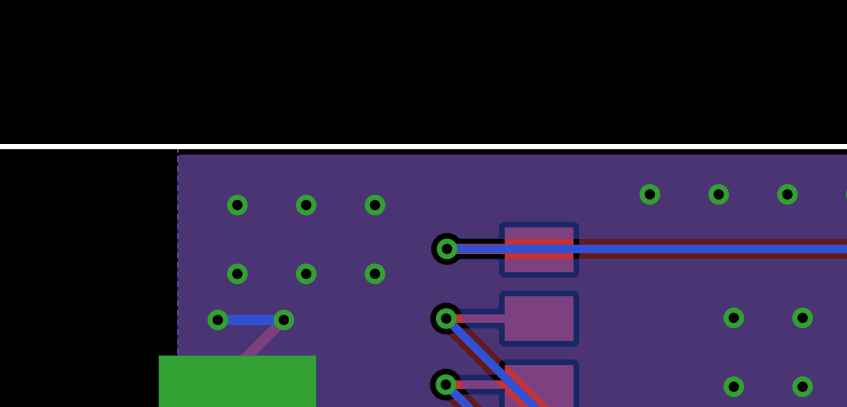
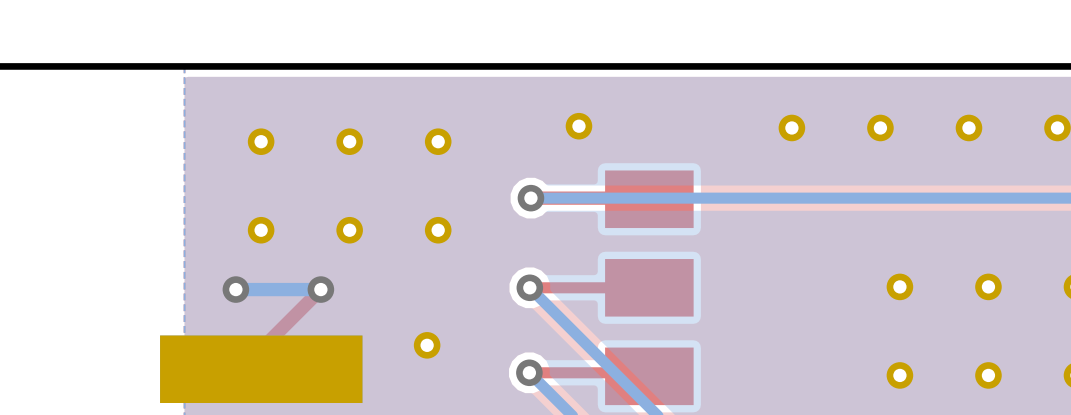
part: none -> (578, 126)
part: none -> (427, 345)

